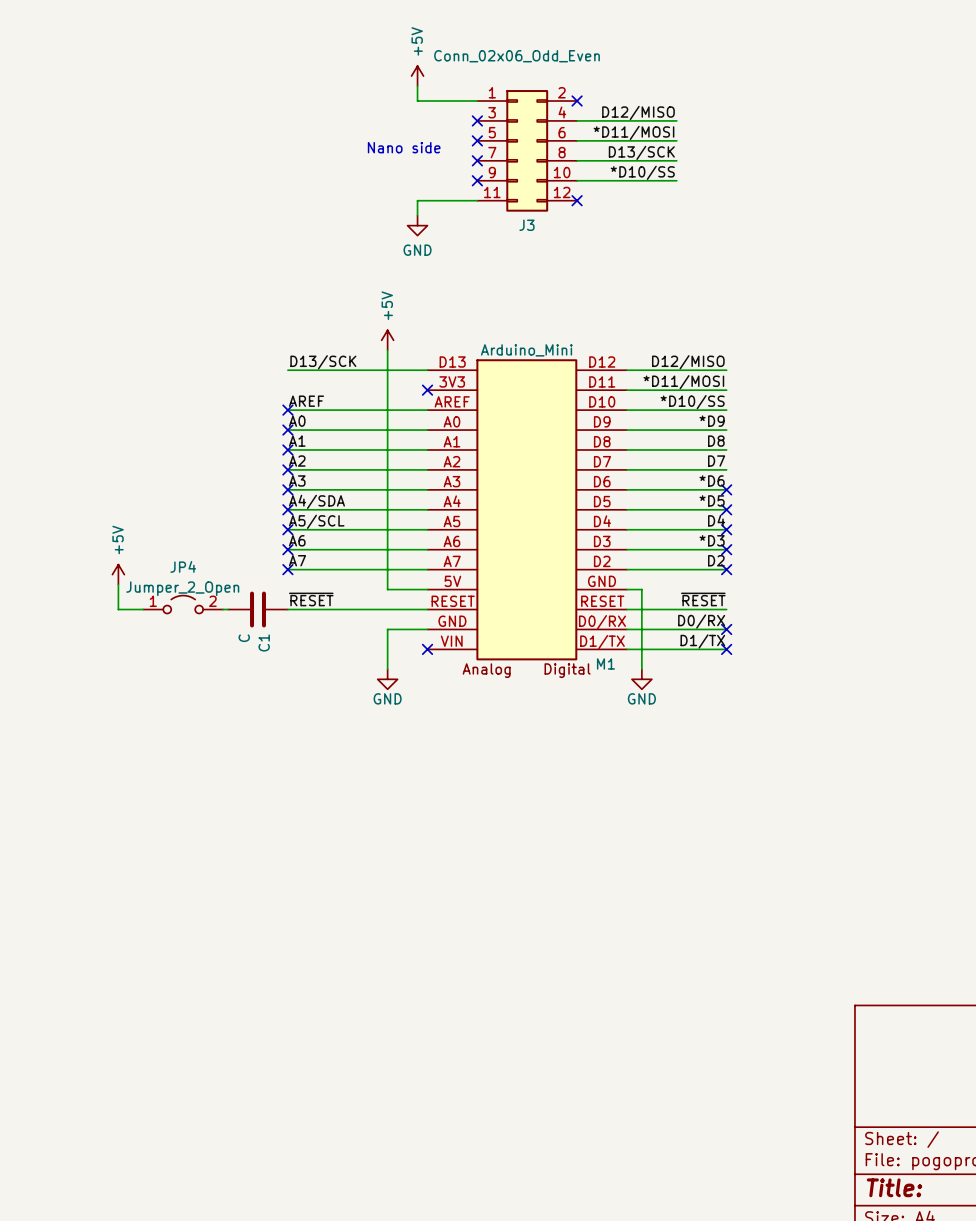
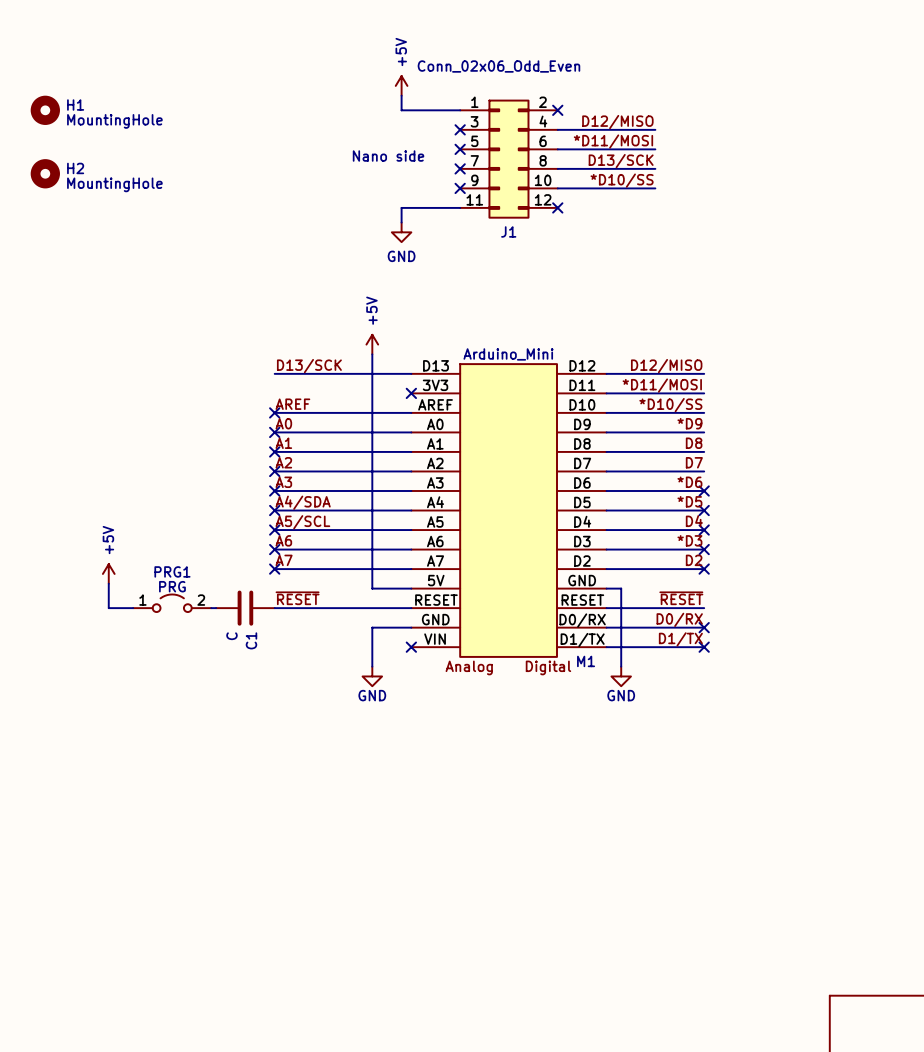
H1: none -> MountingHole (45, 110)
H2: none -> MountingHole (45, 173)
J3 name: J3 (526, 225) -> J1 (508, 231)
JP4 name: JP4 (183, 566) -> PRG1 (172, 571)
JP4 value: Jumper_2_Open (182, 588) -> PRG (172, 586)

